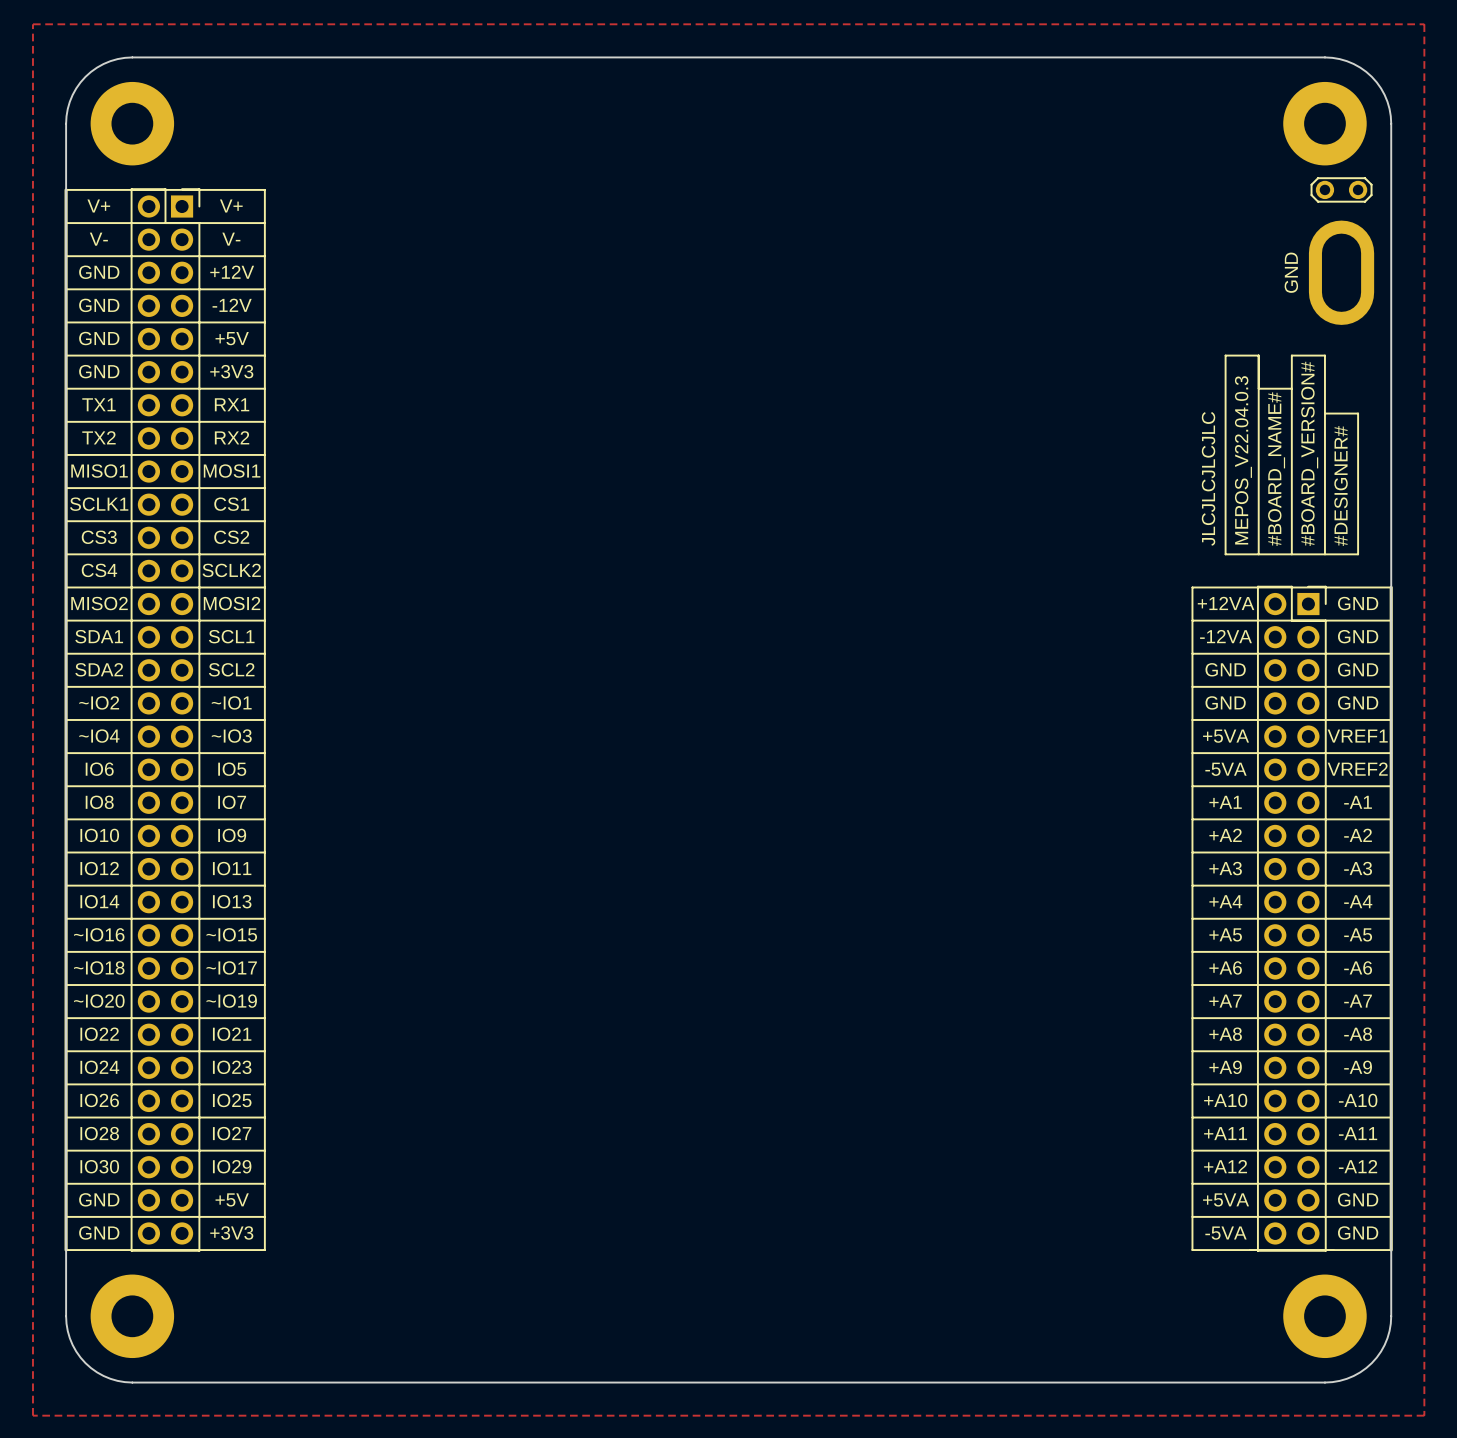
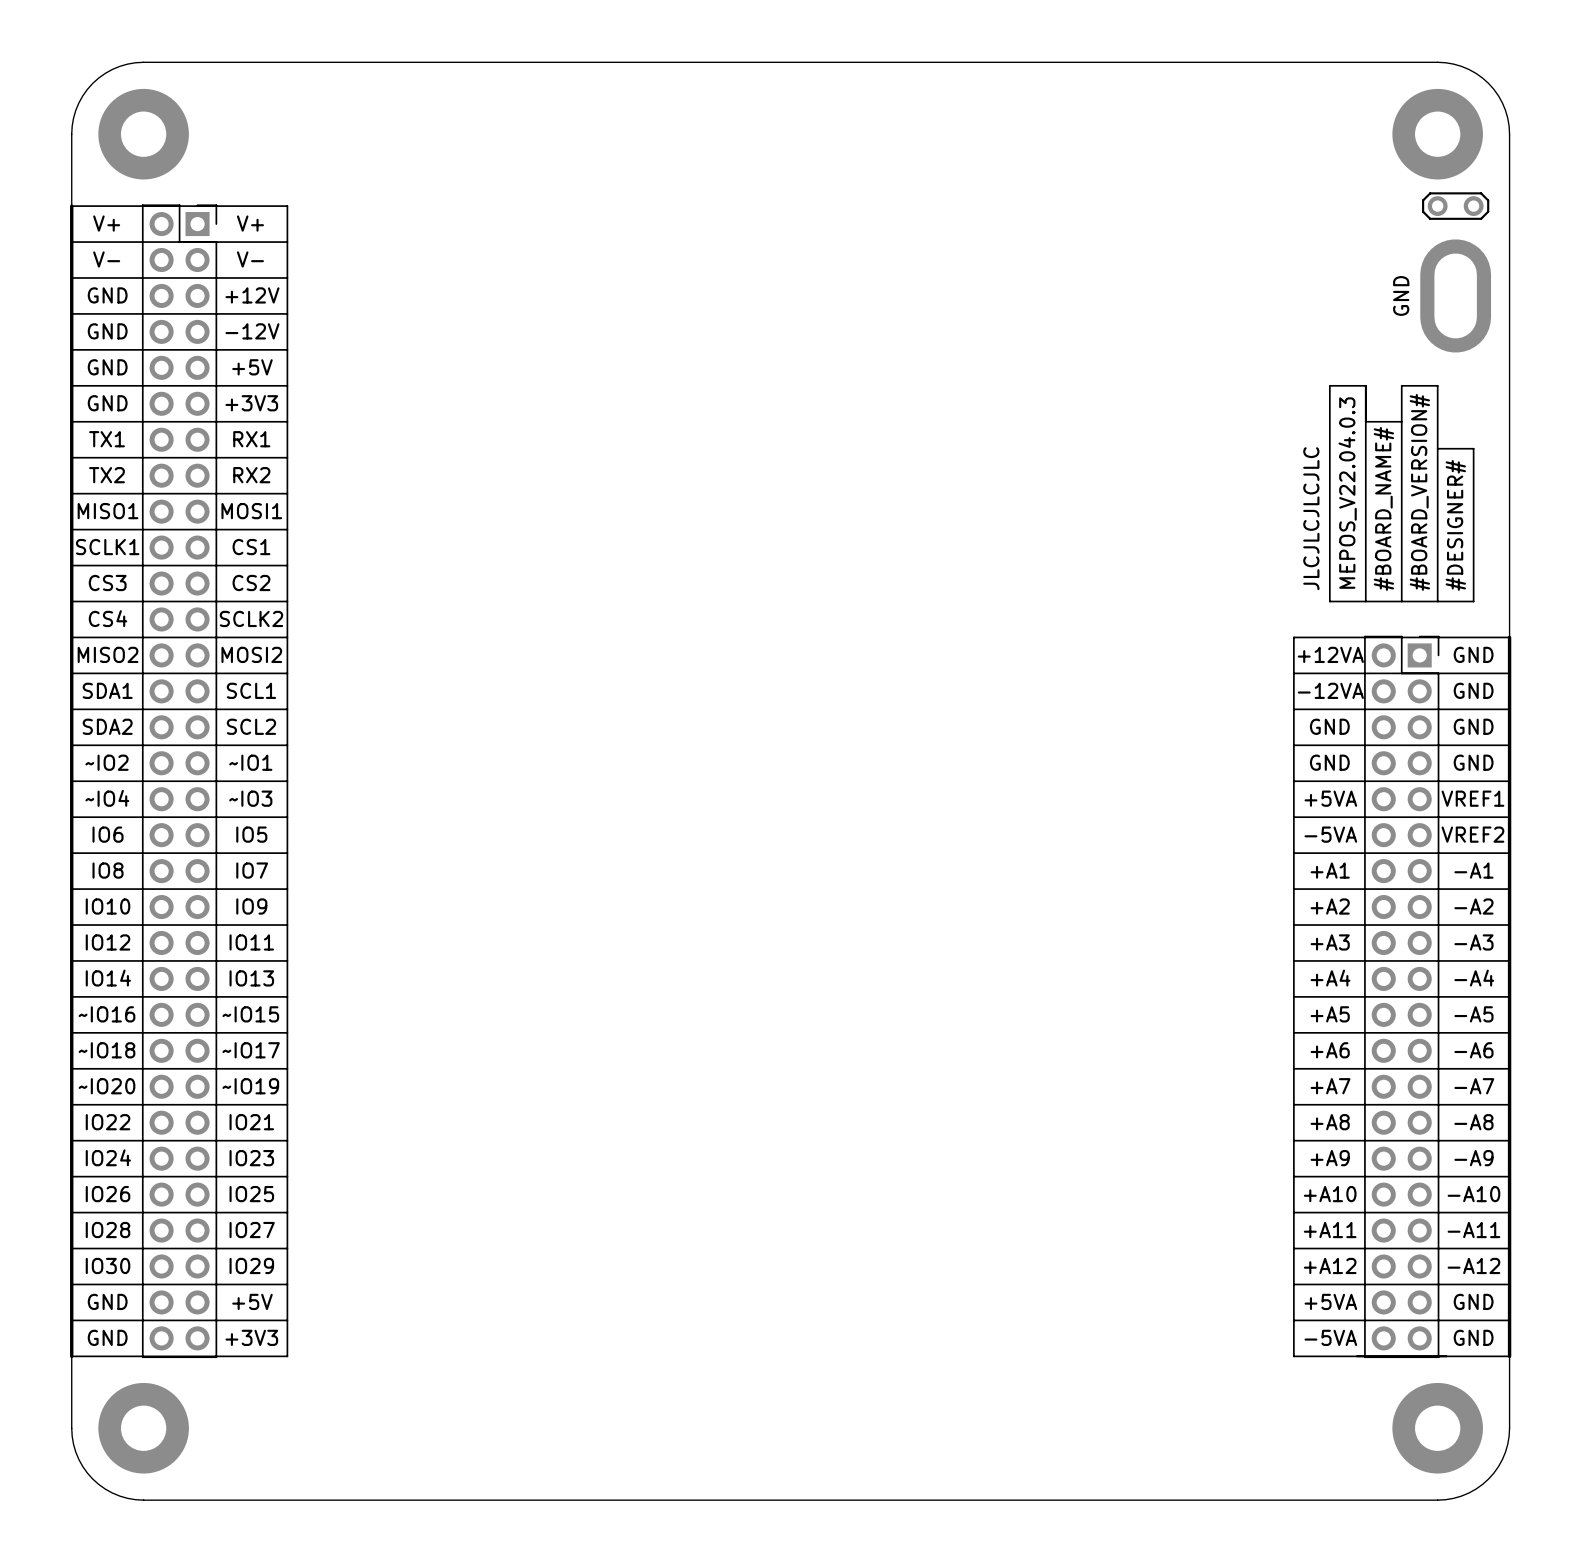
zone outline: (32, 24) (32, 1415) (1424, 1415) (1424, 24) (32, 24) -> none

